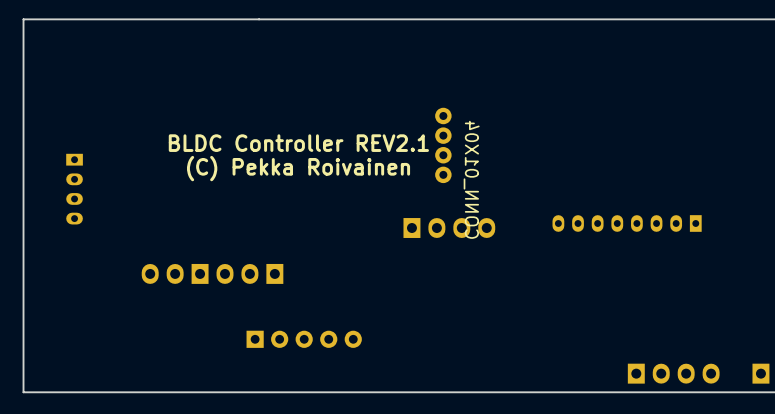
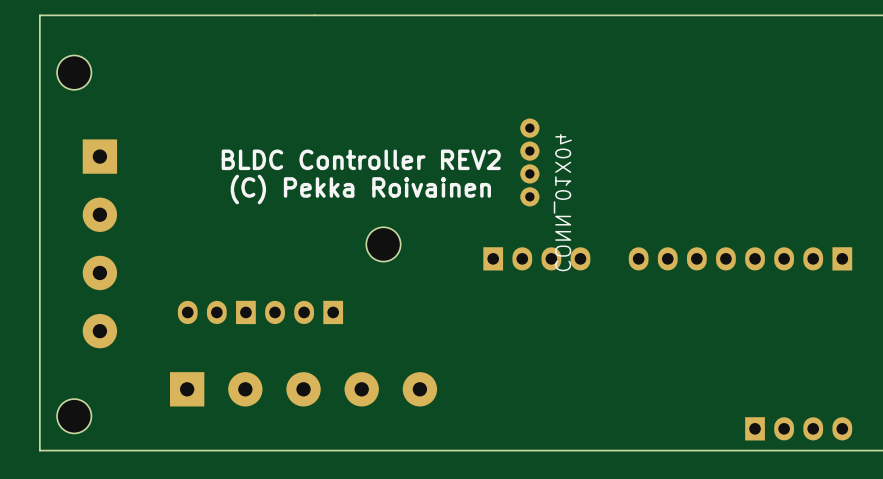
part: none -> (74, 72)
text: BLDC Controller REV2.1 (298, 143) -> BLDC Controller REV2 (361, 159)
part: (74, 189) -> none
part: none -> (99, 243)
part: none -> (383, 244)
part footprint: [552, 215, 702, 232] -> [628, 247, 853, 271]
part: none -> (303, 389)
part: (304, 339) -> none
part: none -> (74, 416)

